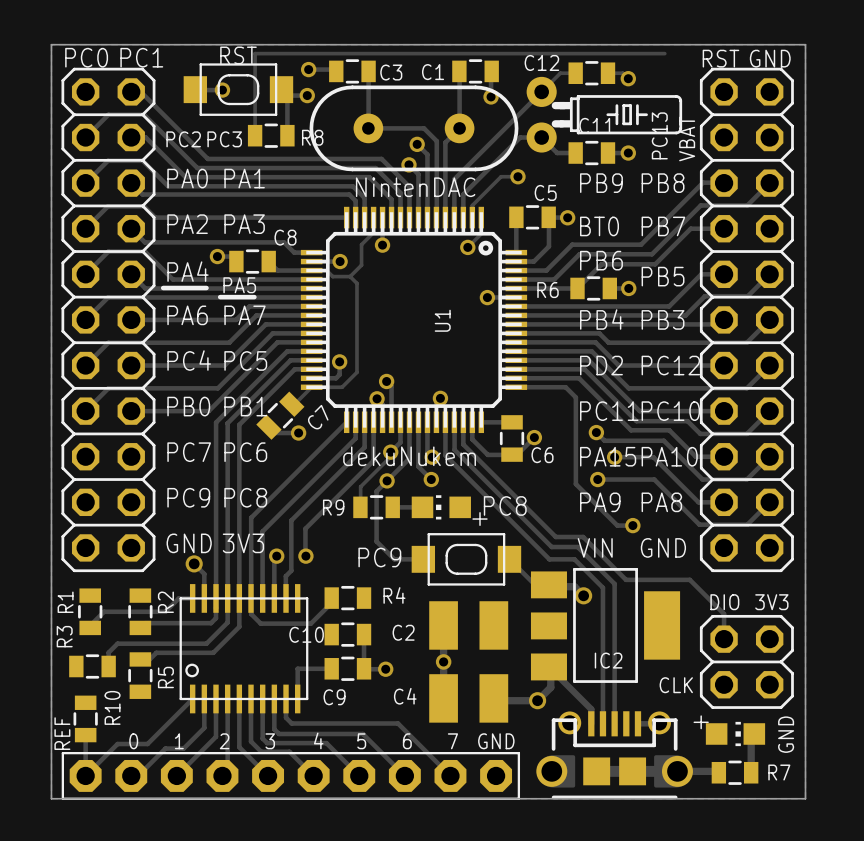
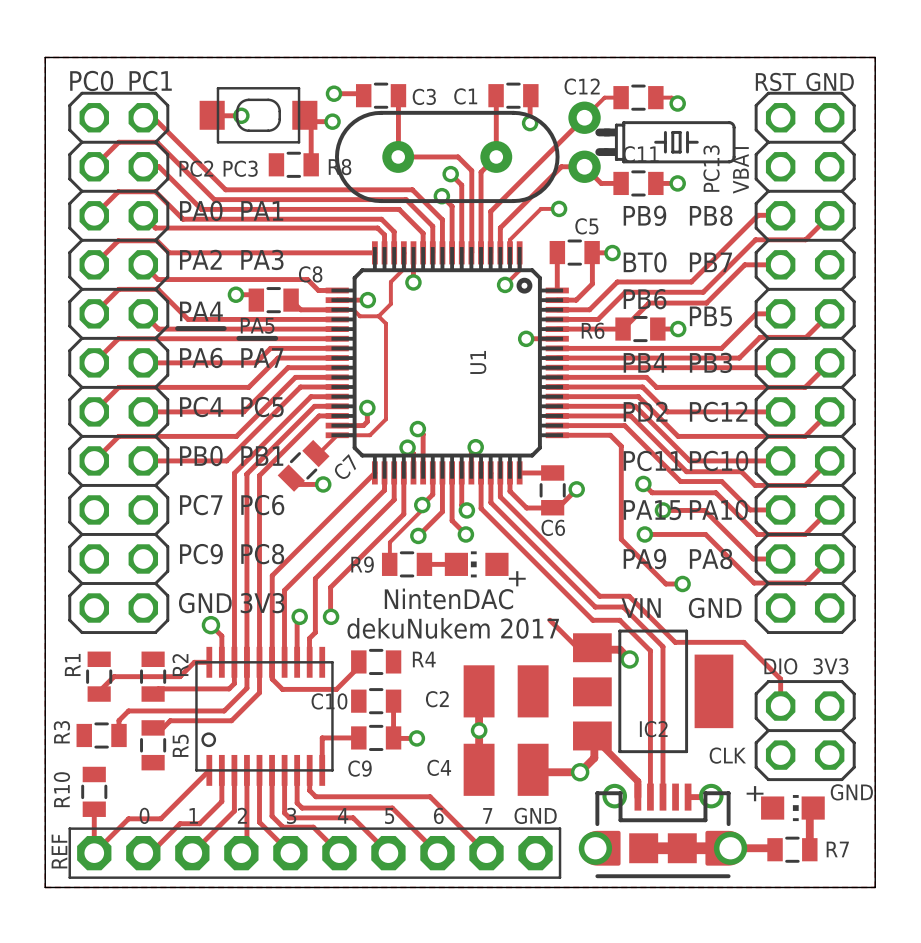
board edge: (51, 44) (805, 44) (805, 798) (51, 798) (51, 44) -> (45, 57) (45, 887) (875, 887) (875, 57) (45, 57)
track: (664, 53) (255, 53) (255, 135) -> none
text: RST (238, 55) -> none
text position: NintenDAC (415, 187) -> NintenDAC (448, 598)
C6 name position: C6 (542, 455) -> C6 (553, 527)
text: dekuNukem (409, 456) -> none
track: (387, 480) (376, 491) (376, 541) (394, 559) (423, 559) -> none
text: PC8 (505, 505) -> none
text: PC9 (379, 557) -> none
part: (466, 559) -> none
text: none -> dekuNukem 2017 (453, 628)
R3 name position: R3 (64, 636) -> R3 (61, 732)
R10 name position: R10 (112, 707) -> R10 (61, 789)
text position: REF (62, 733) -> REF (59, 851)
text rotation: 0° (786, 734) -> 90° clockwise (851, 792)

